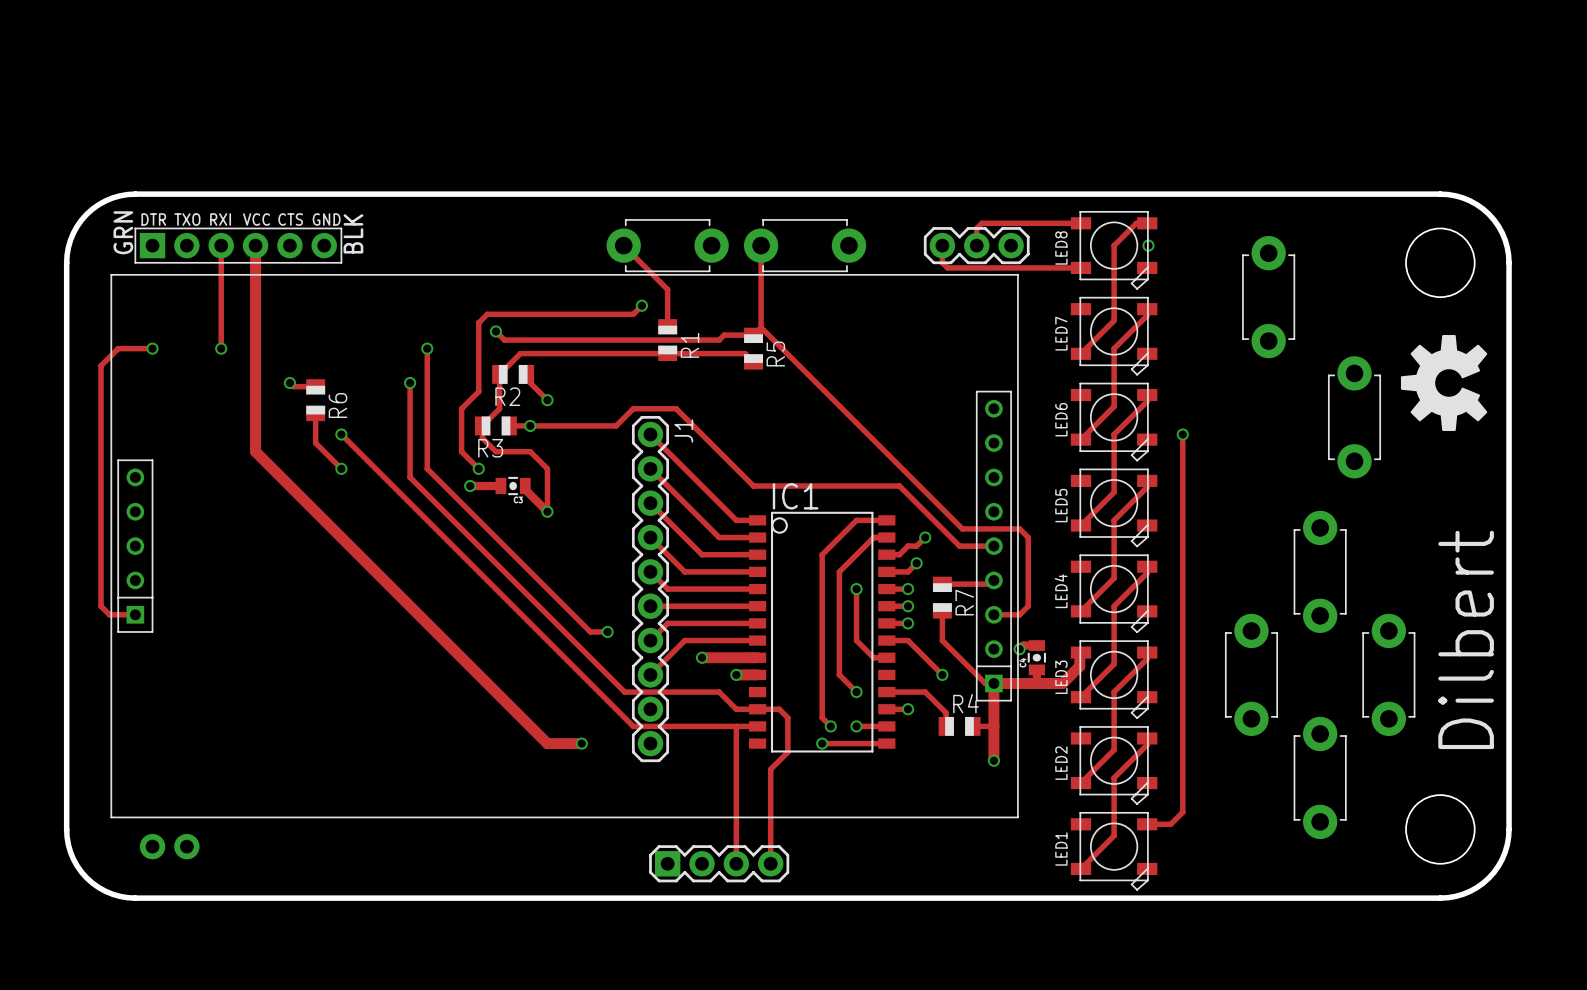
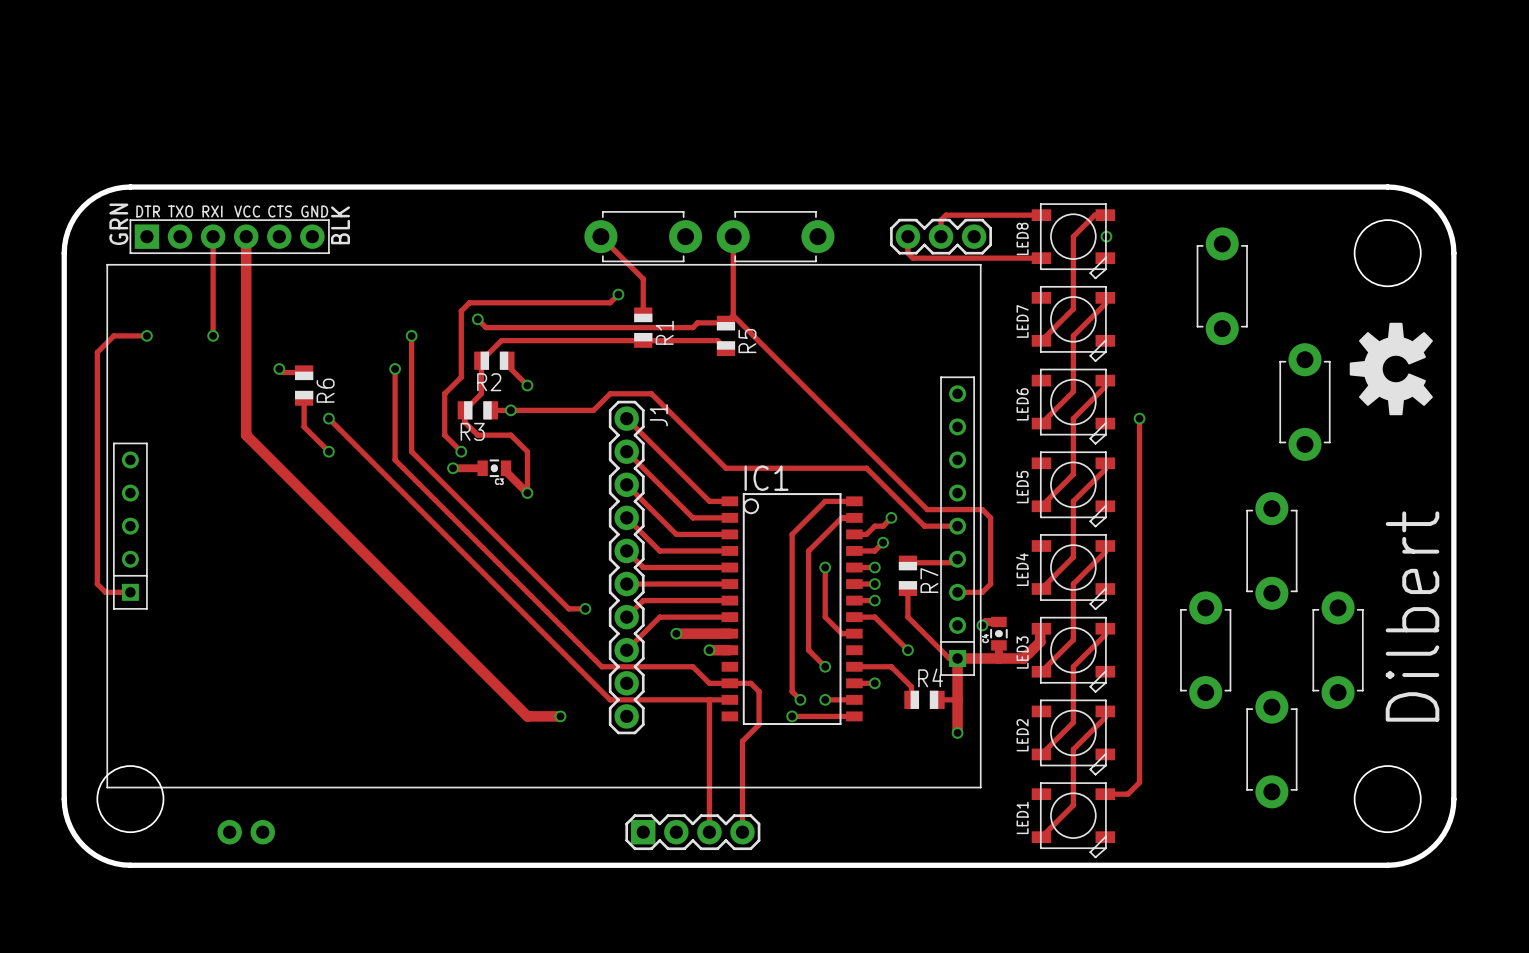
drawing: none -> [96, 765, 165, 834]
part position: (169, 846) -> (246, 832)

